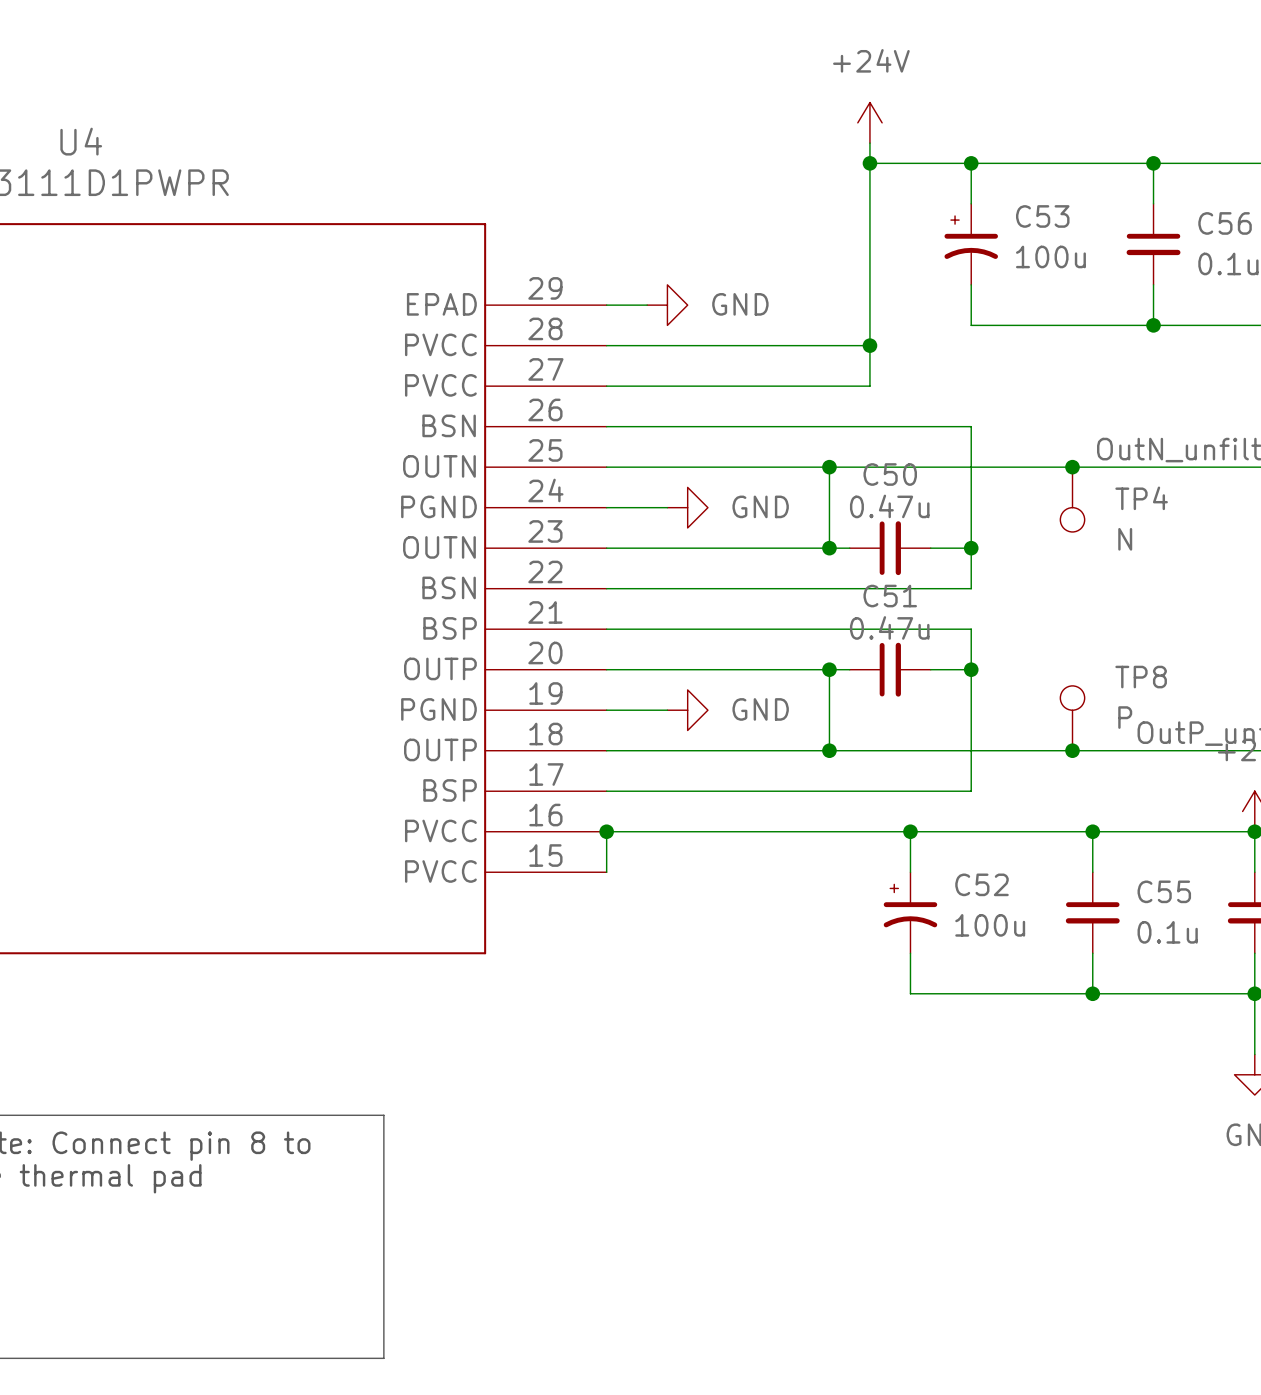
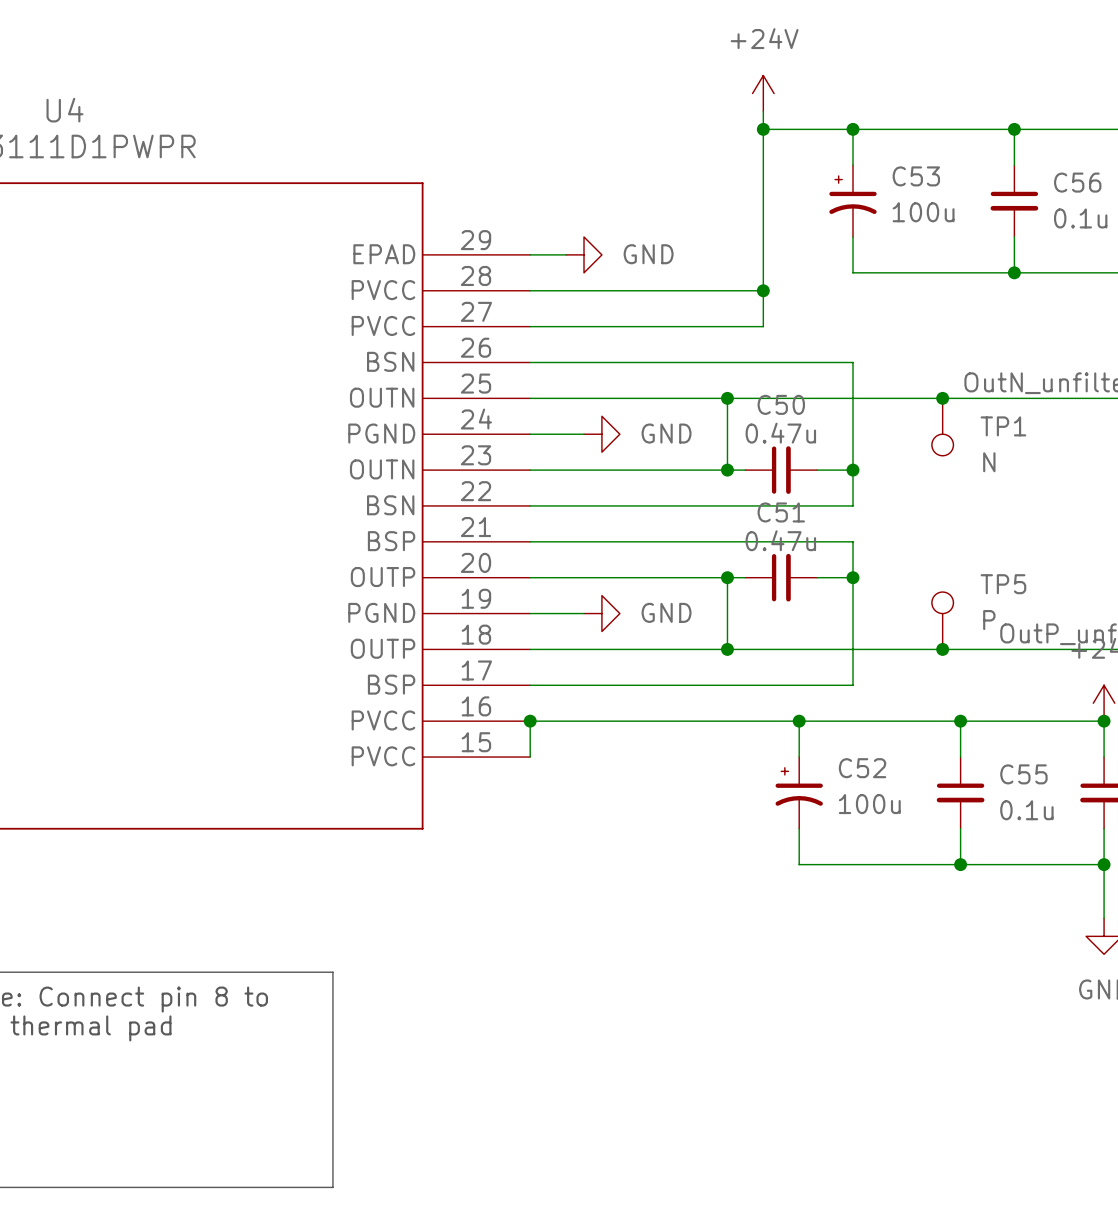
TP4 name: TP4 (1141, 498) -> TP1 (1003, 426)
TP8 name: TP8 (1141, 677) -> TP5 (1003, 584)

